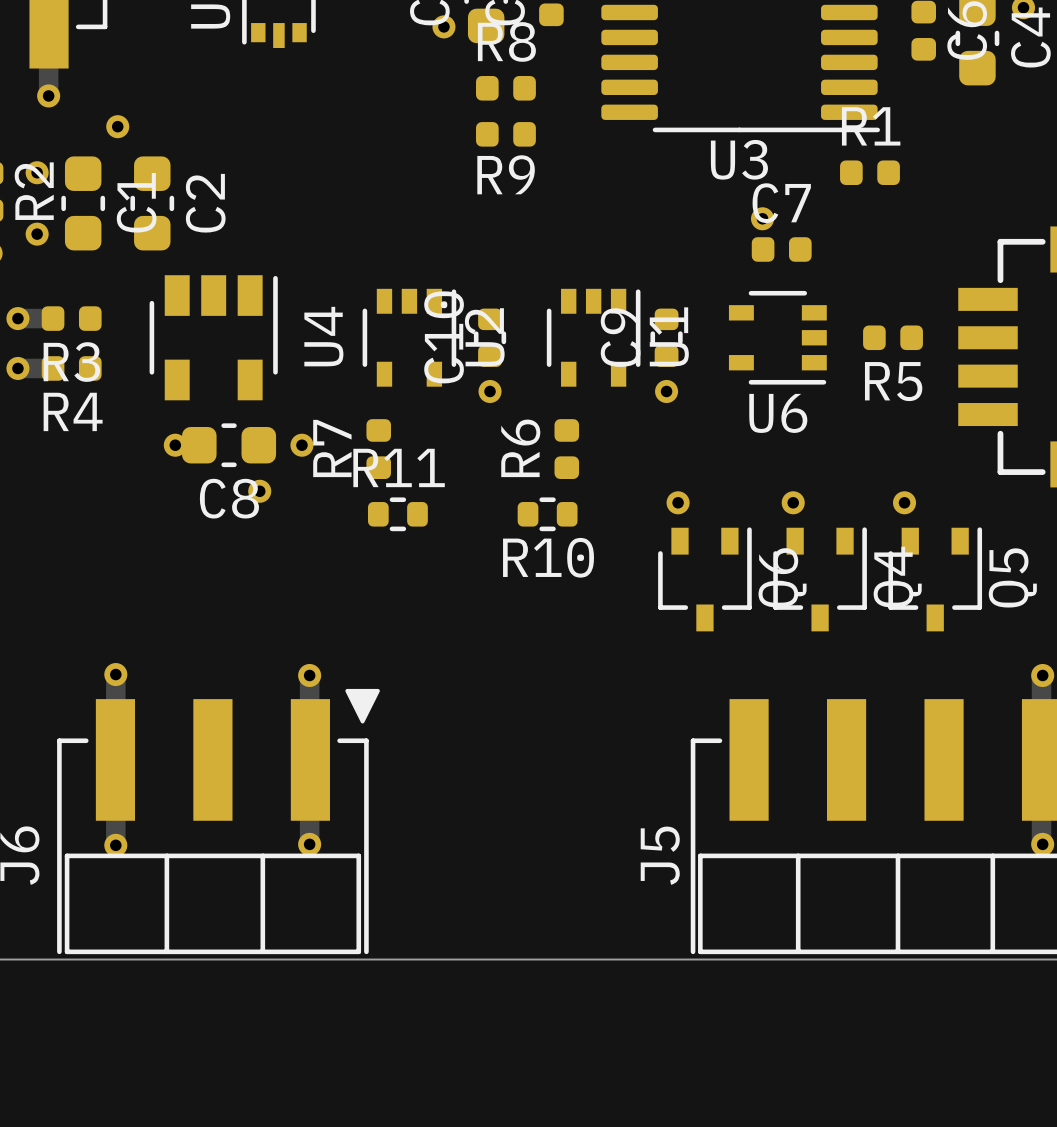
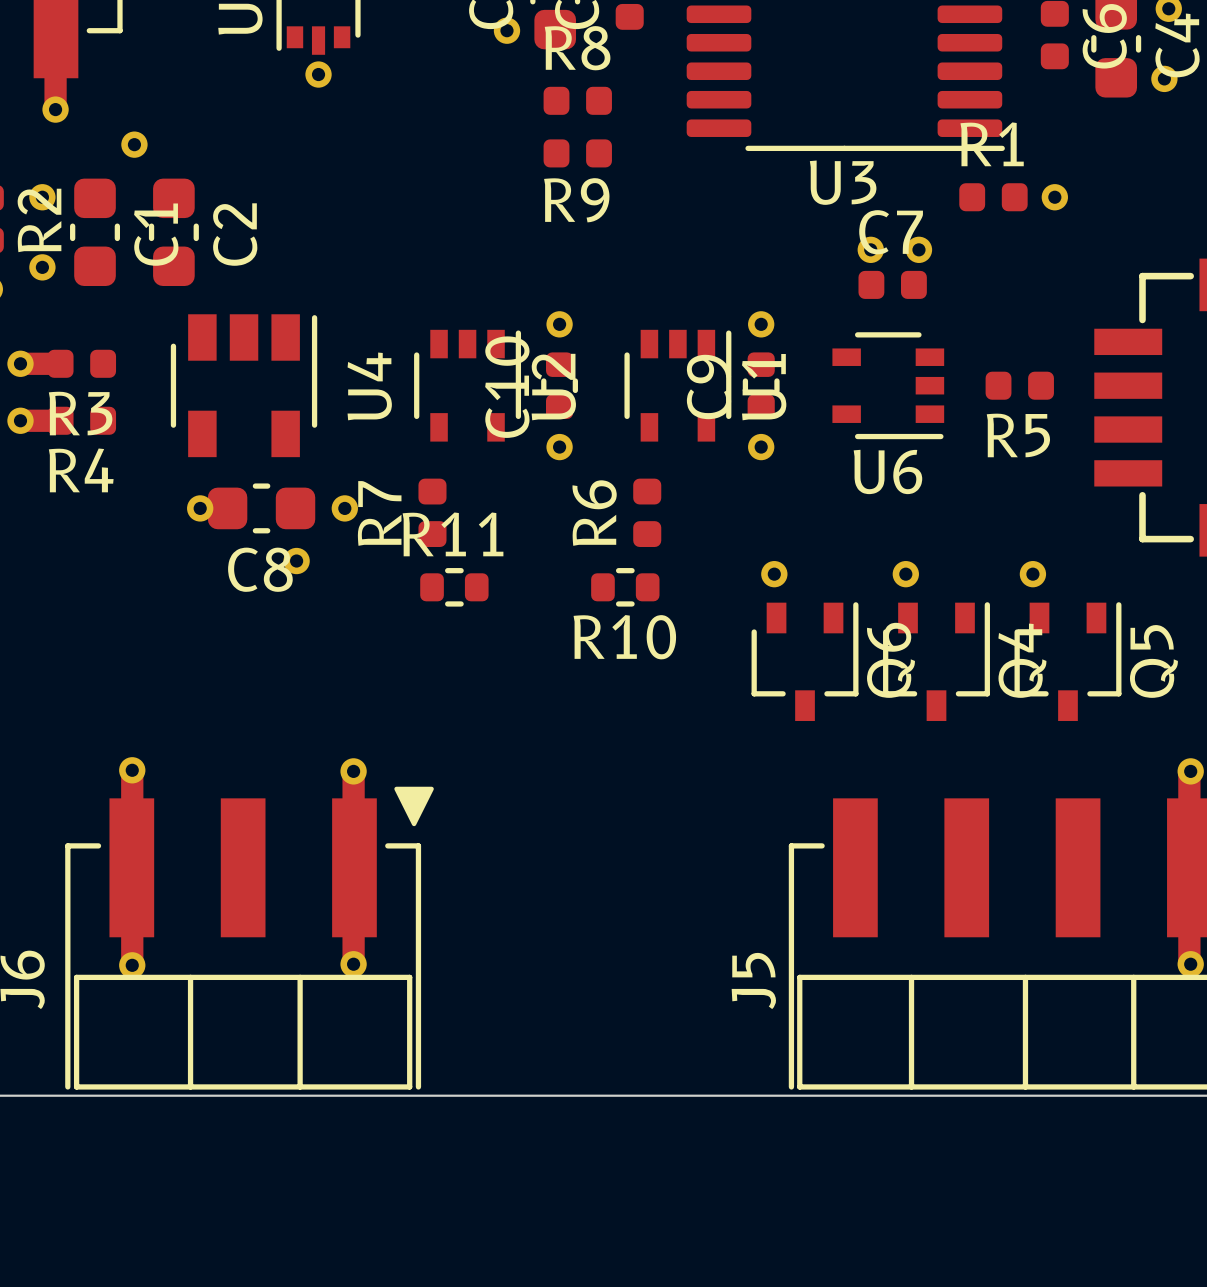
part: none -> (318, 74)
part: none -> (1164, 78)
part: none -> (1054, 197)
part: none -> (918, 249)
part: none -> (559, 324)
part: none -> (761, 324)

